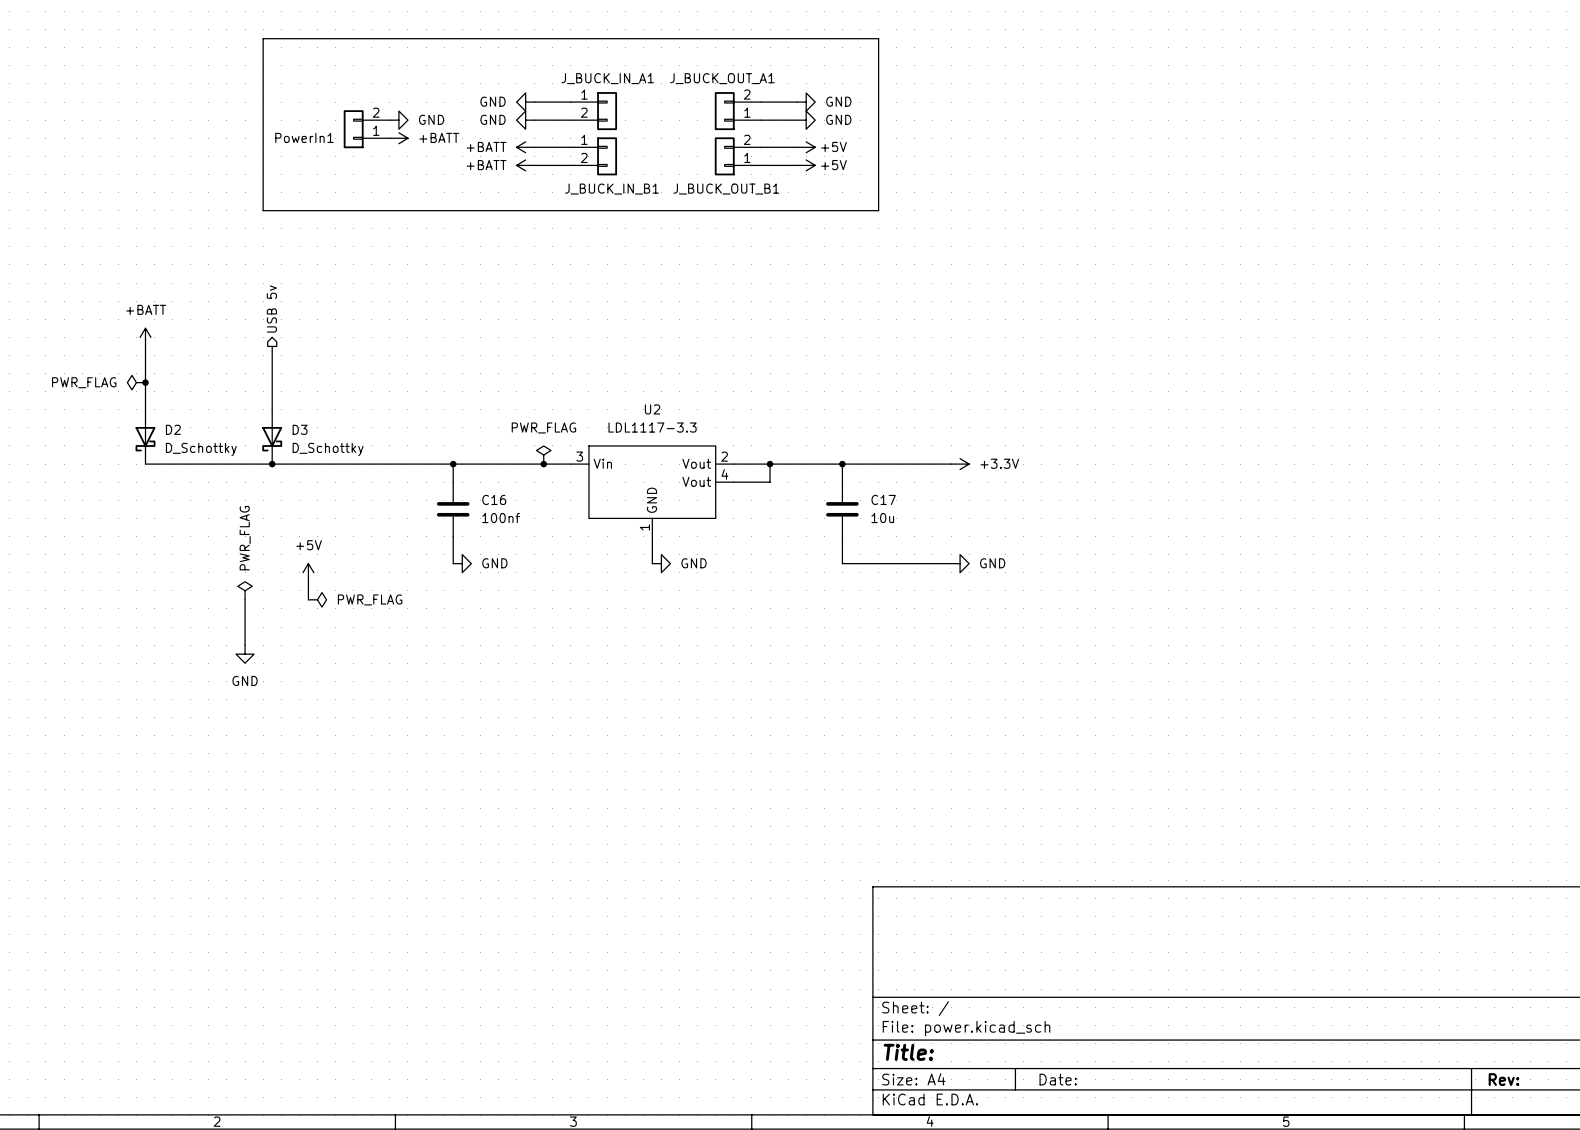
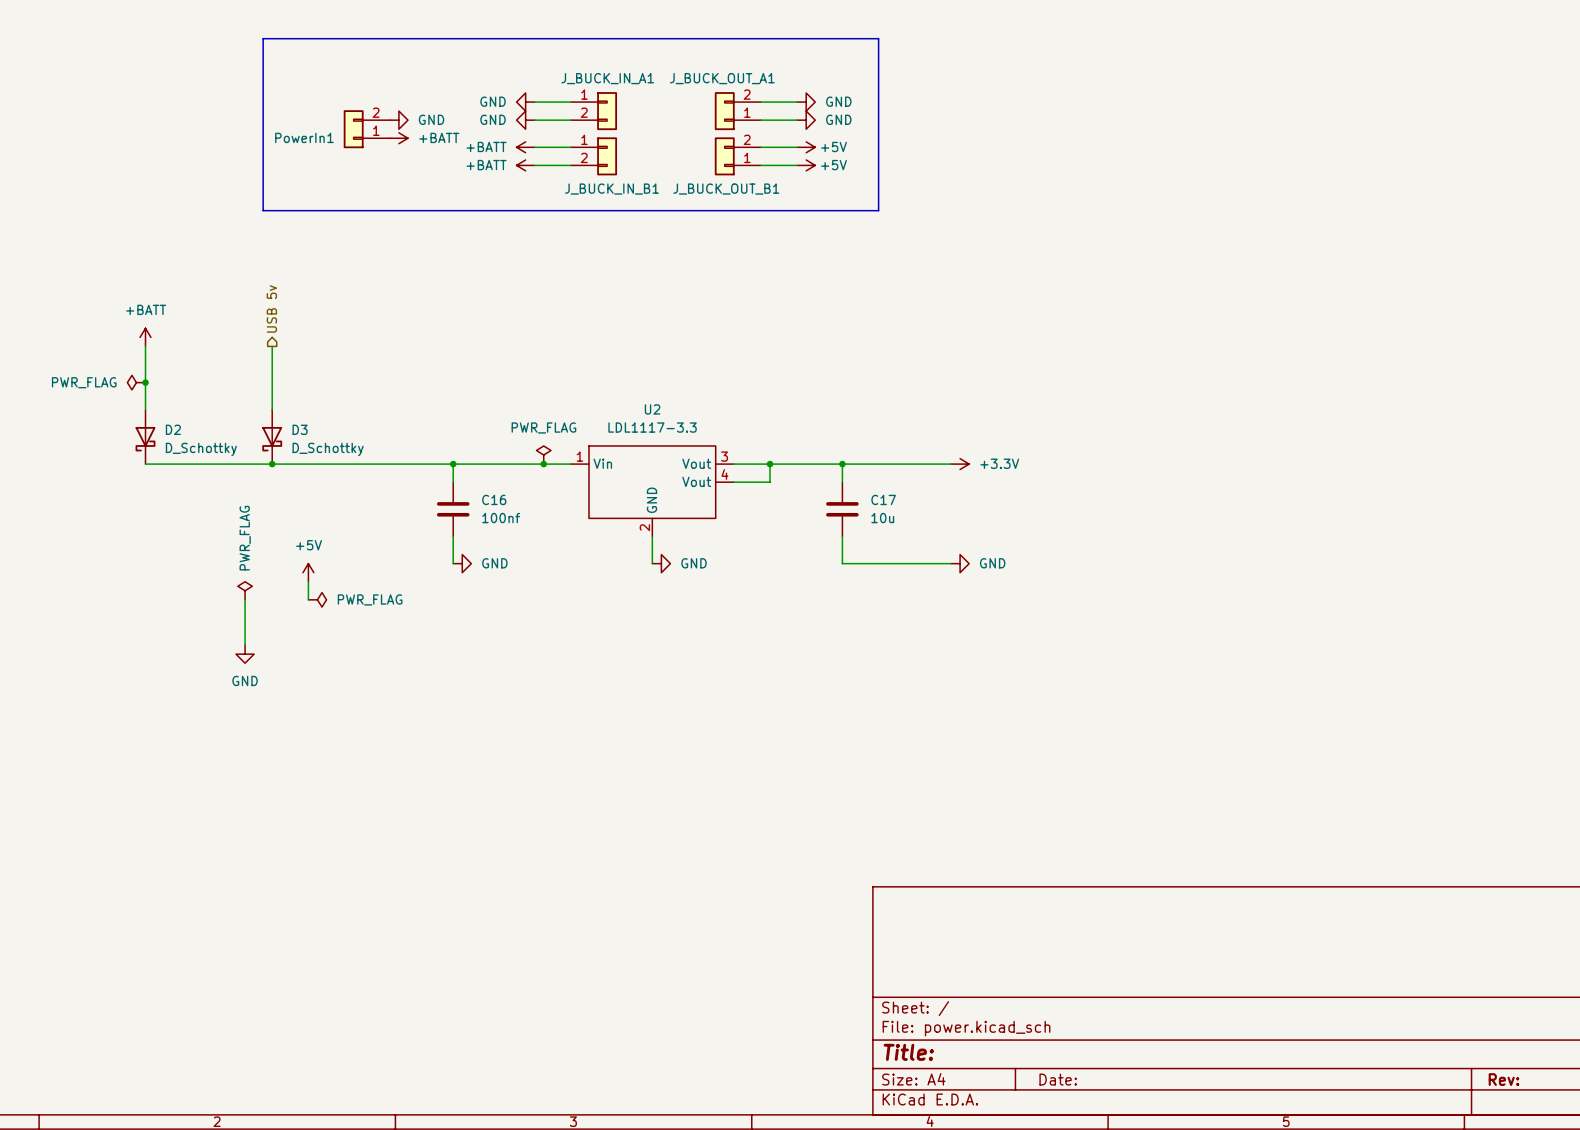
U2 pin number: 3 (579, 456) -> 1 (579, 456)
U2 pin number: 2 (724, 456) -> 3 (724, 456)
U2 pin number: 1 (644, 527) -> 2 (644, 527)

